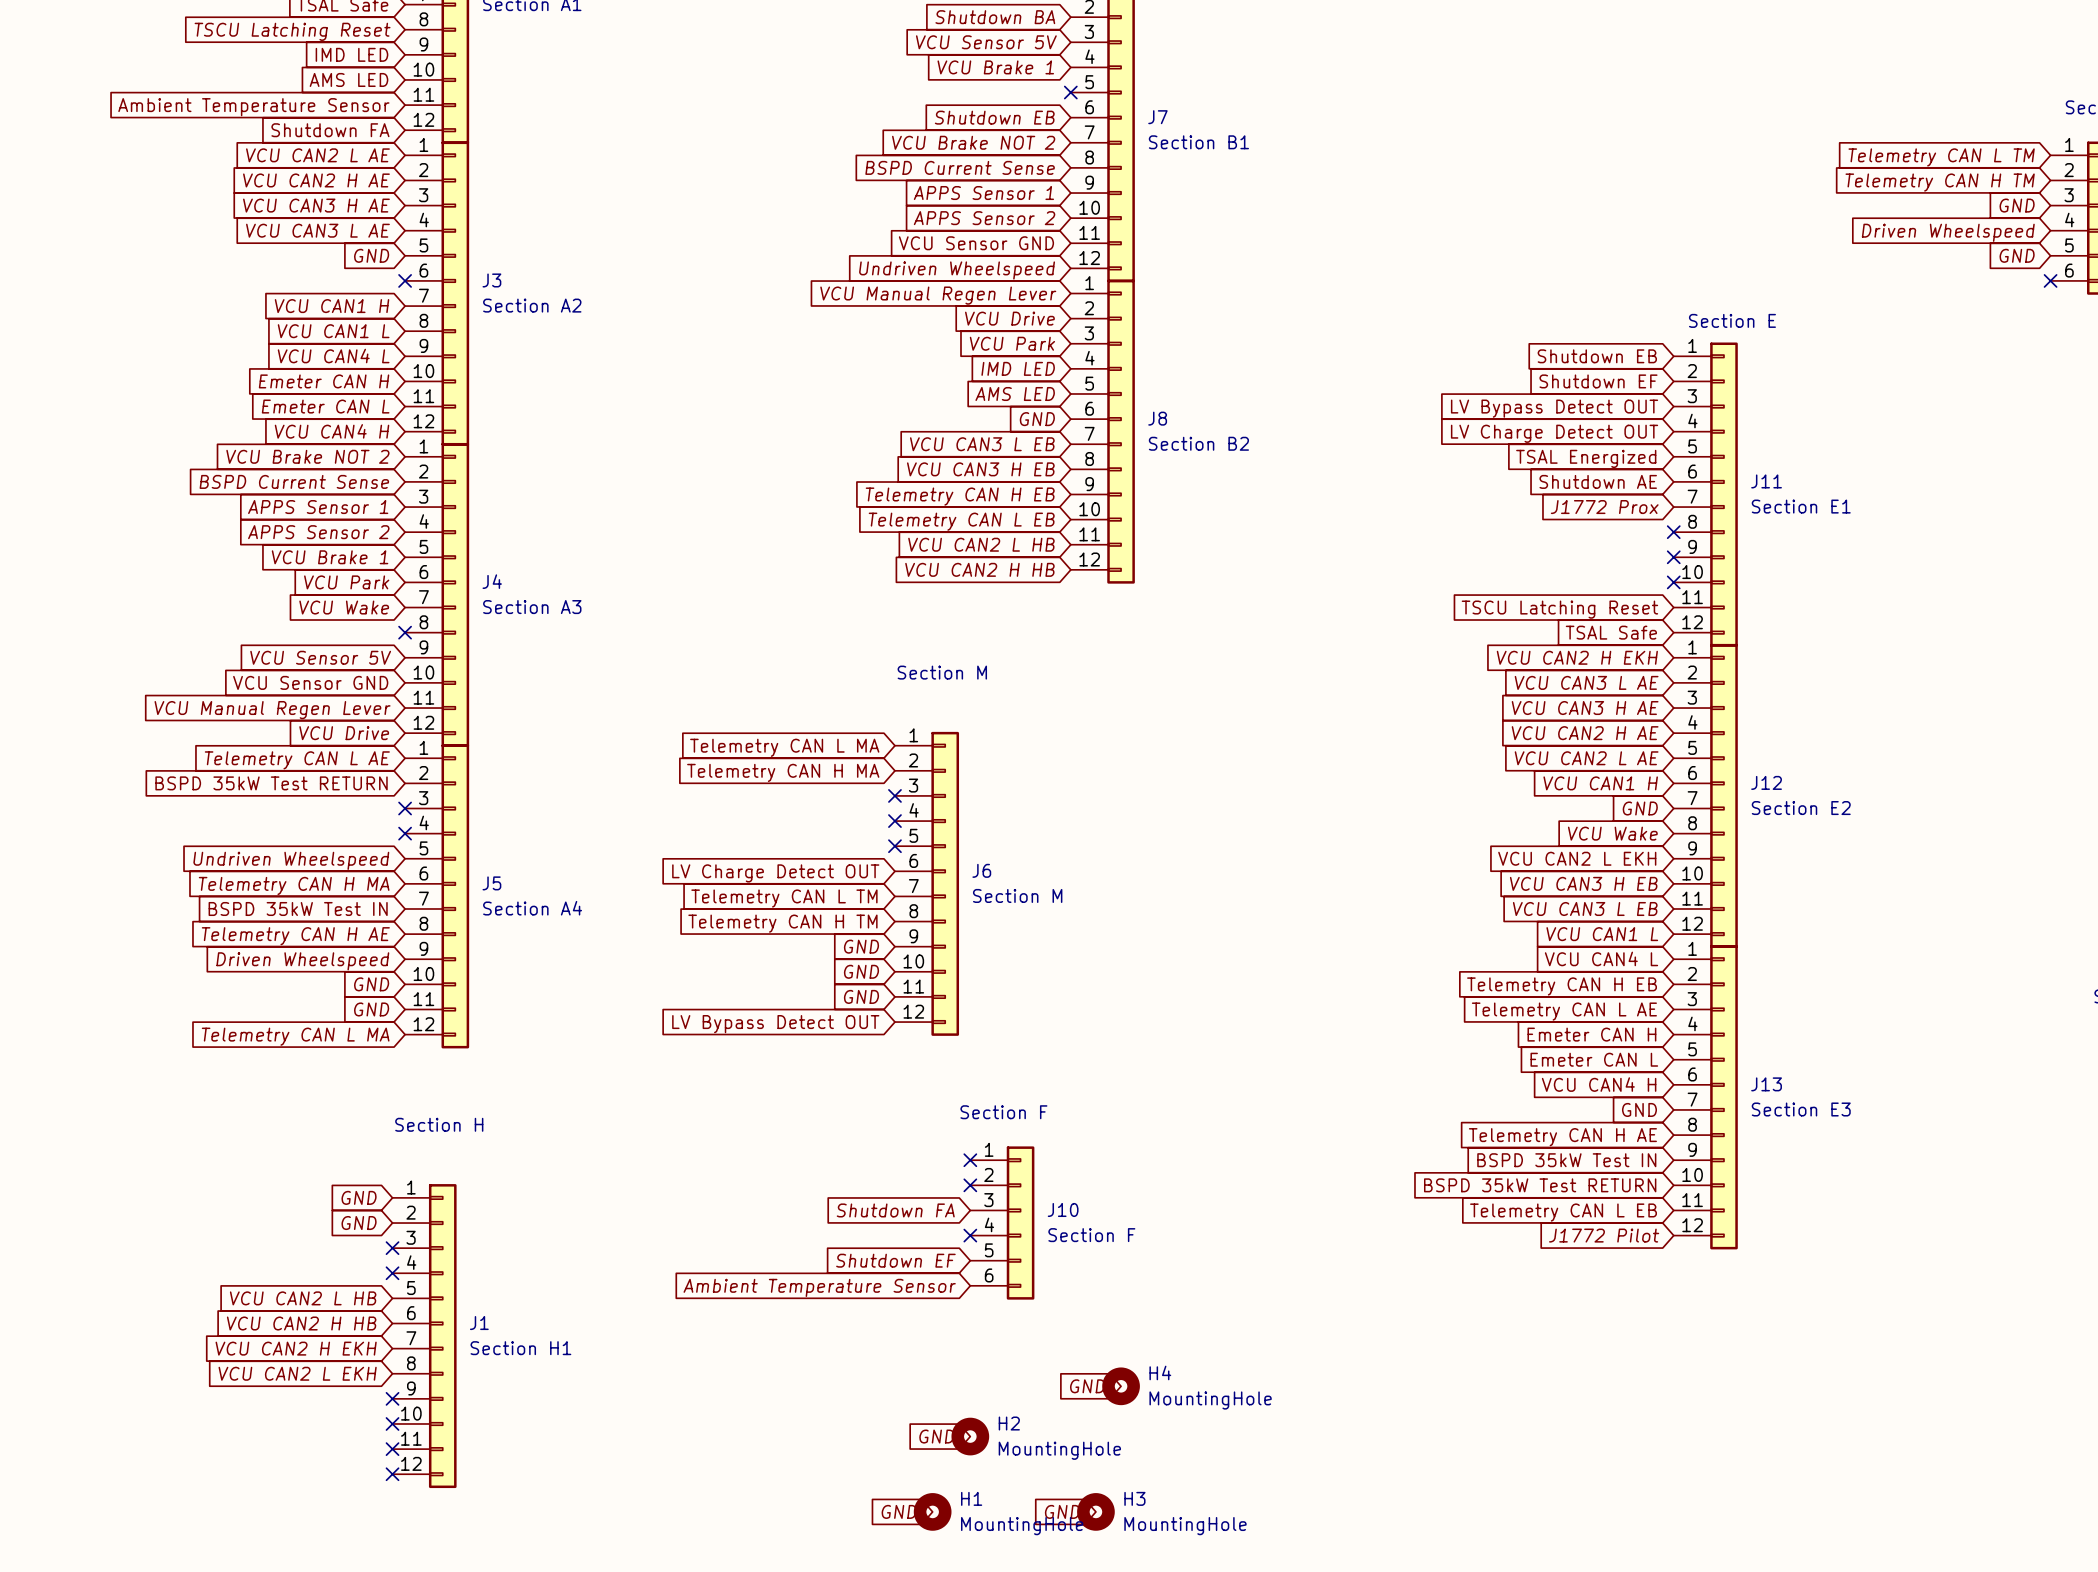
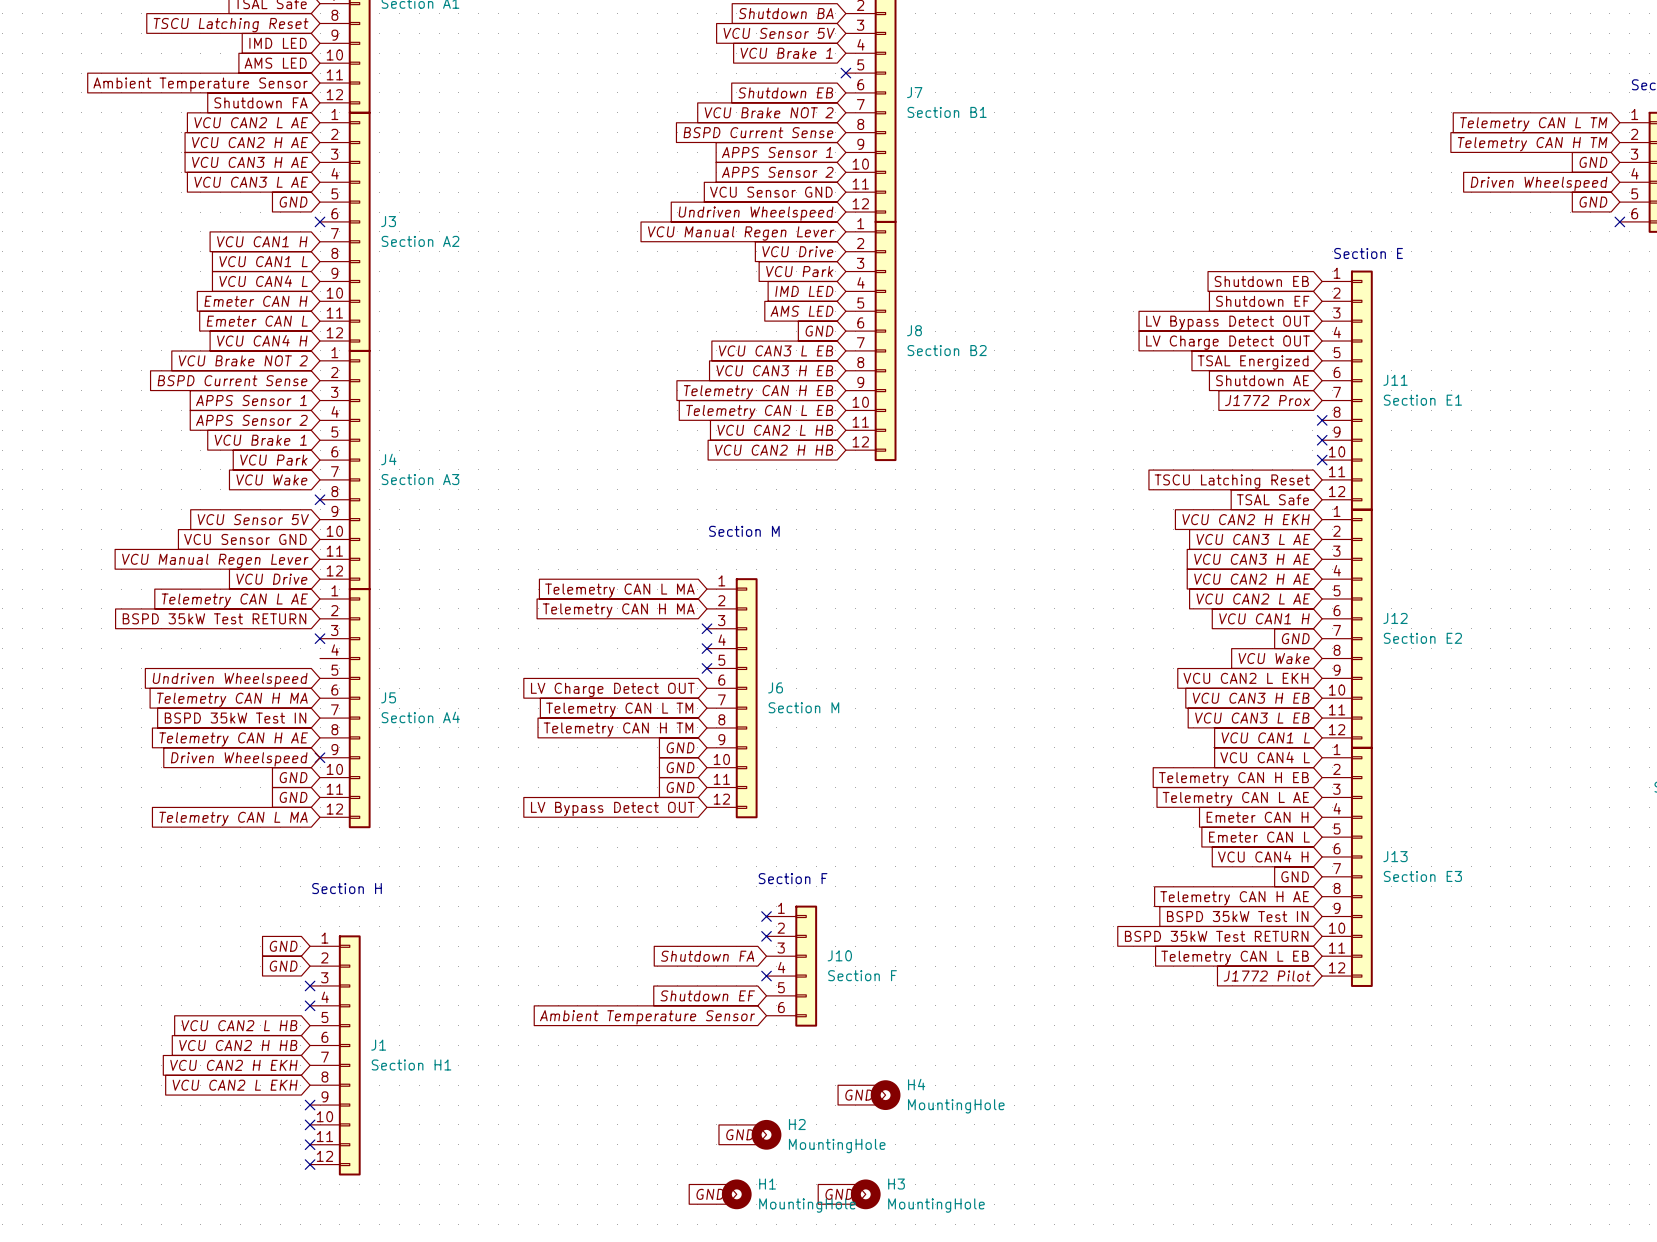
no-connect mark: (405, 833) -> none
no-connect mark: none -> (320, 757)

